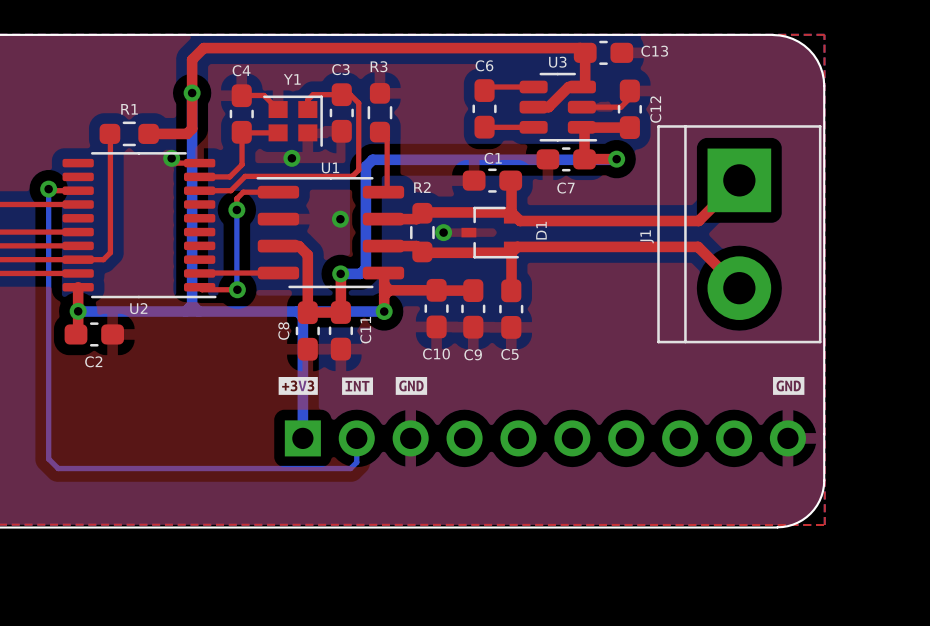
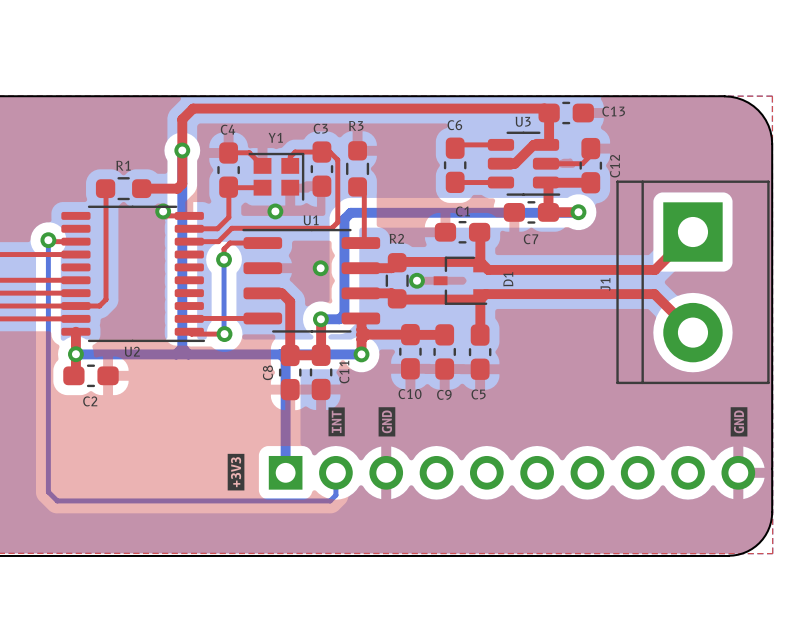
drawing: [278, 376, 318, 395] -> none
drawing shape: [395, 376, 428, 395] -> [378, 407, 396, 437]
drawing shape: [773, 376, 805, 395] -> [730, 407, 748, 437]
drawing shape: [342, 377, 374, 395] -> [328, 407, 345, 437]
drawing: none -> [227, 453, 245, 491]

